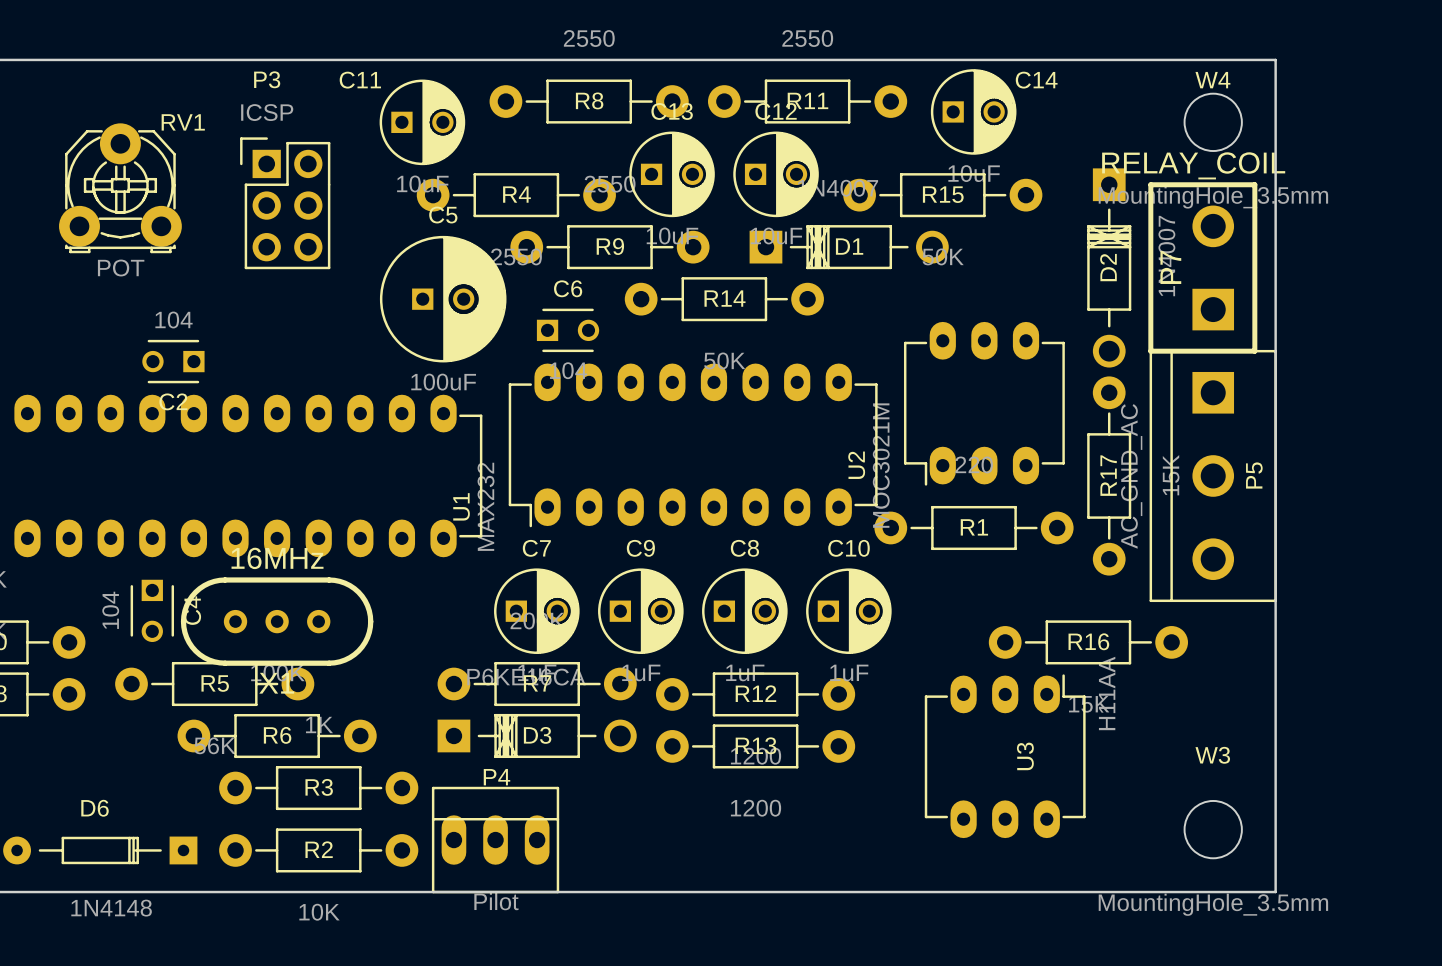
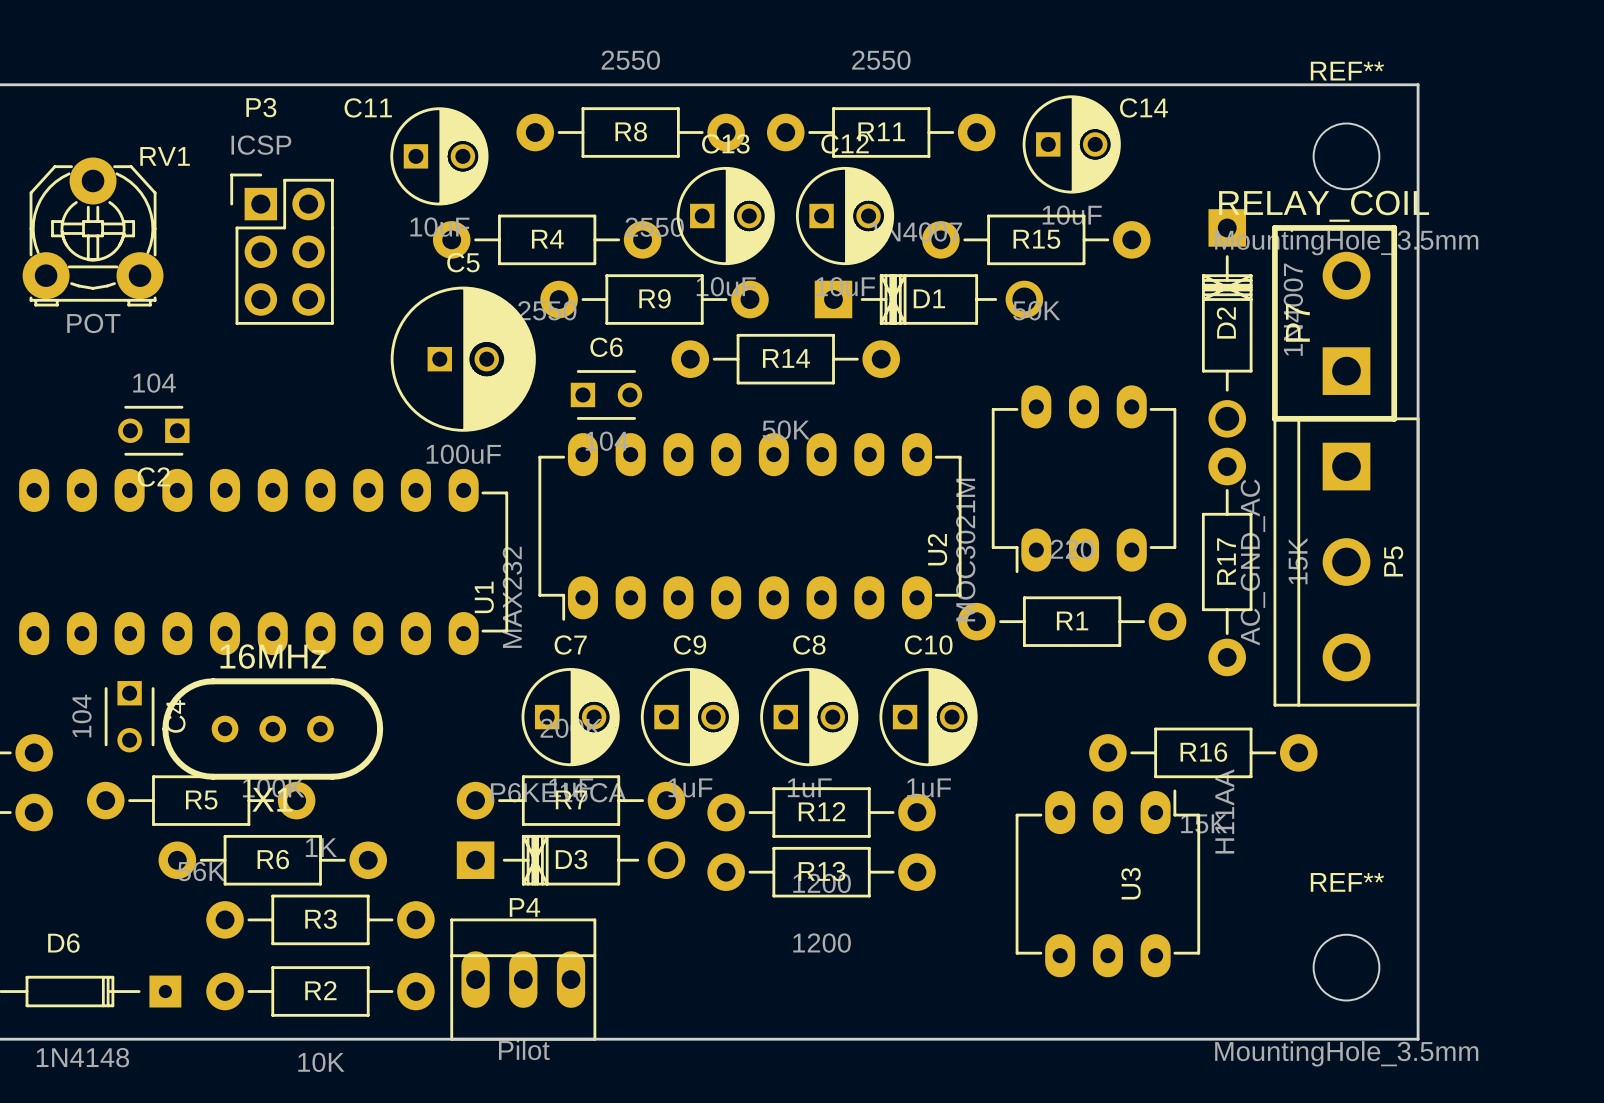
W4 name: W4 (1212, 80) -> REF** (1347, 71)
W3 name: W3 (1212, 755) -> REF** (1347, 882)

